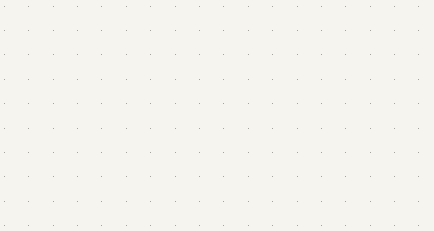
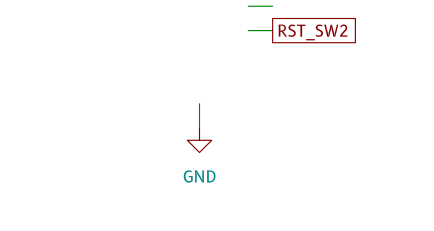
wire: none -> (248, 6) (272, 6)
wire: none -> (248, 30) (272, 30)
global label: none -> RST_SW2 (312, 32)
wire: none -> (199, 103) (199, 128)
power symbol: none -> GND (199, 140)

